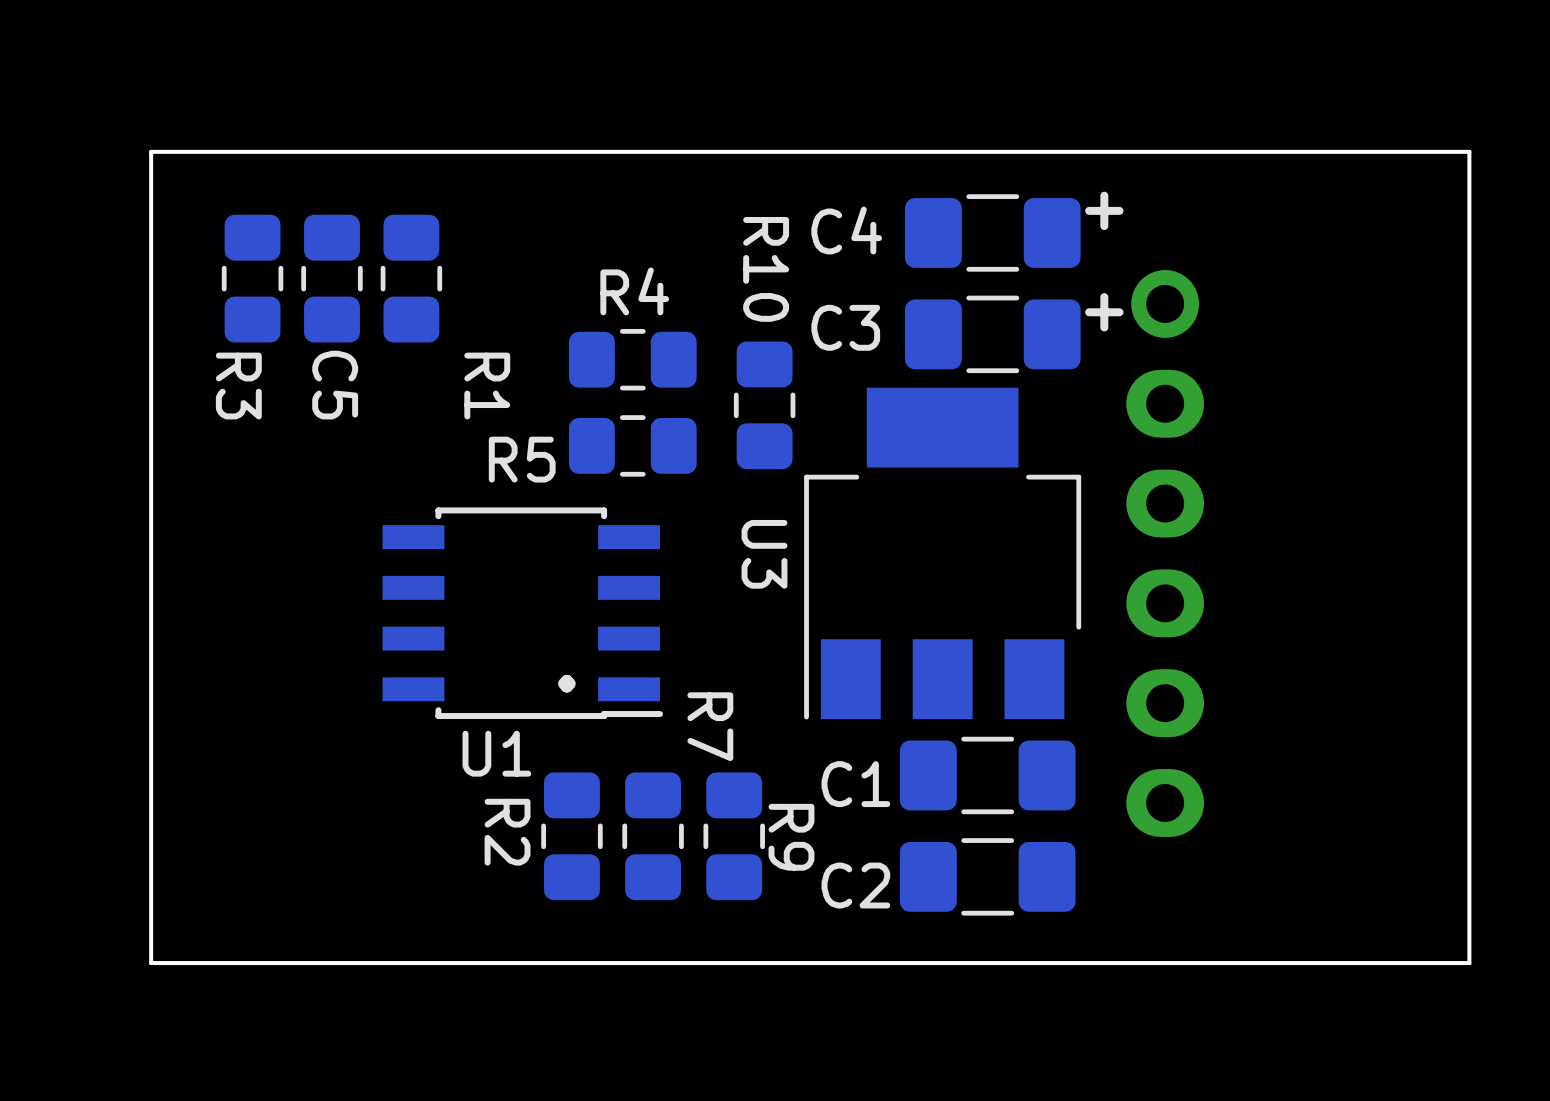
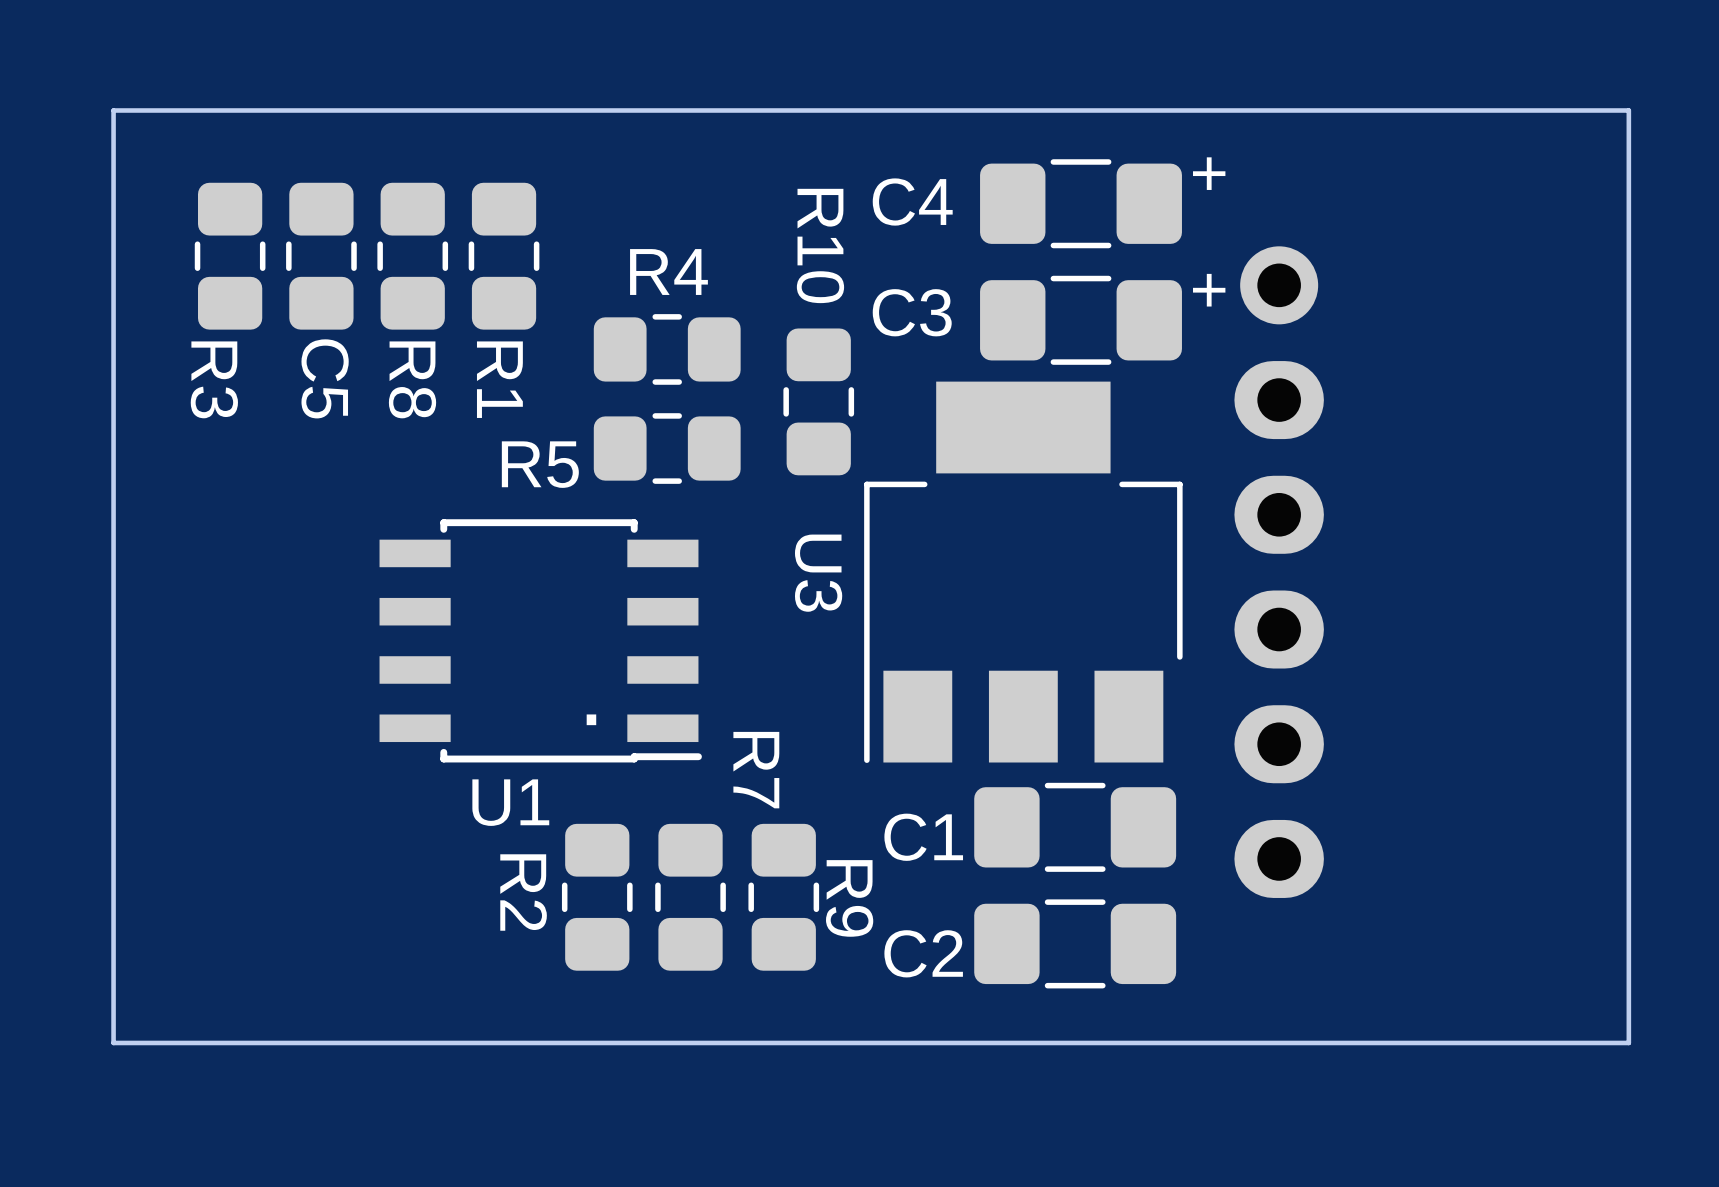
R8: none -> (504, 256)

